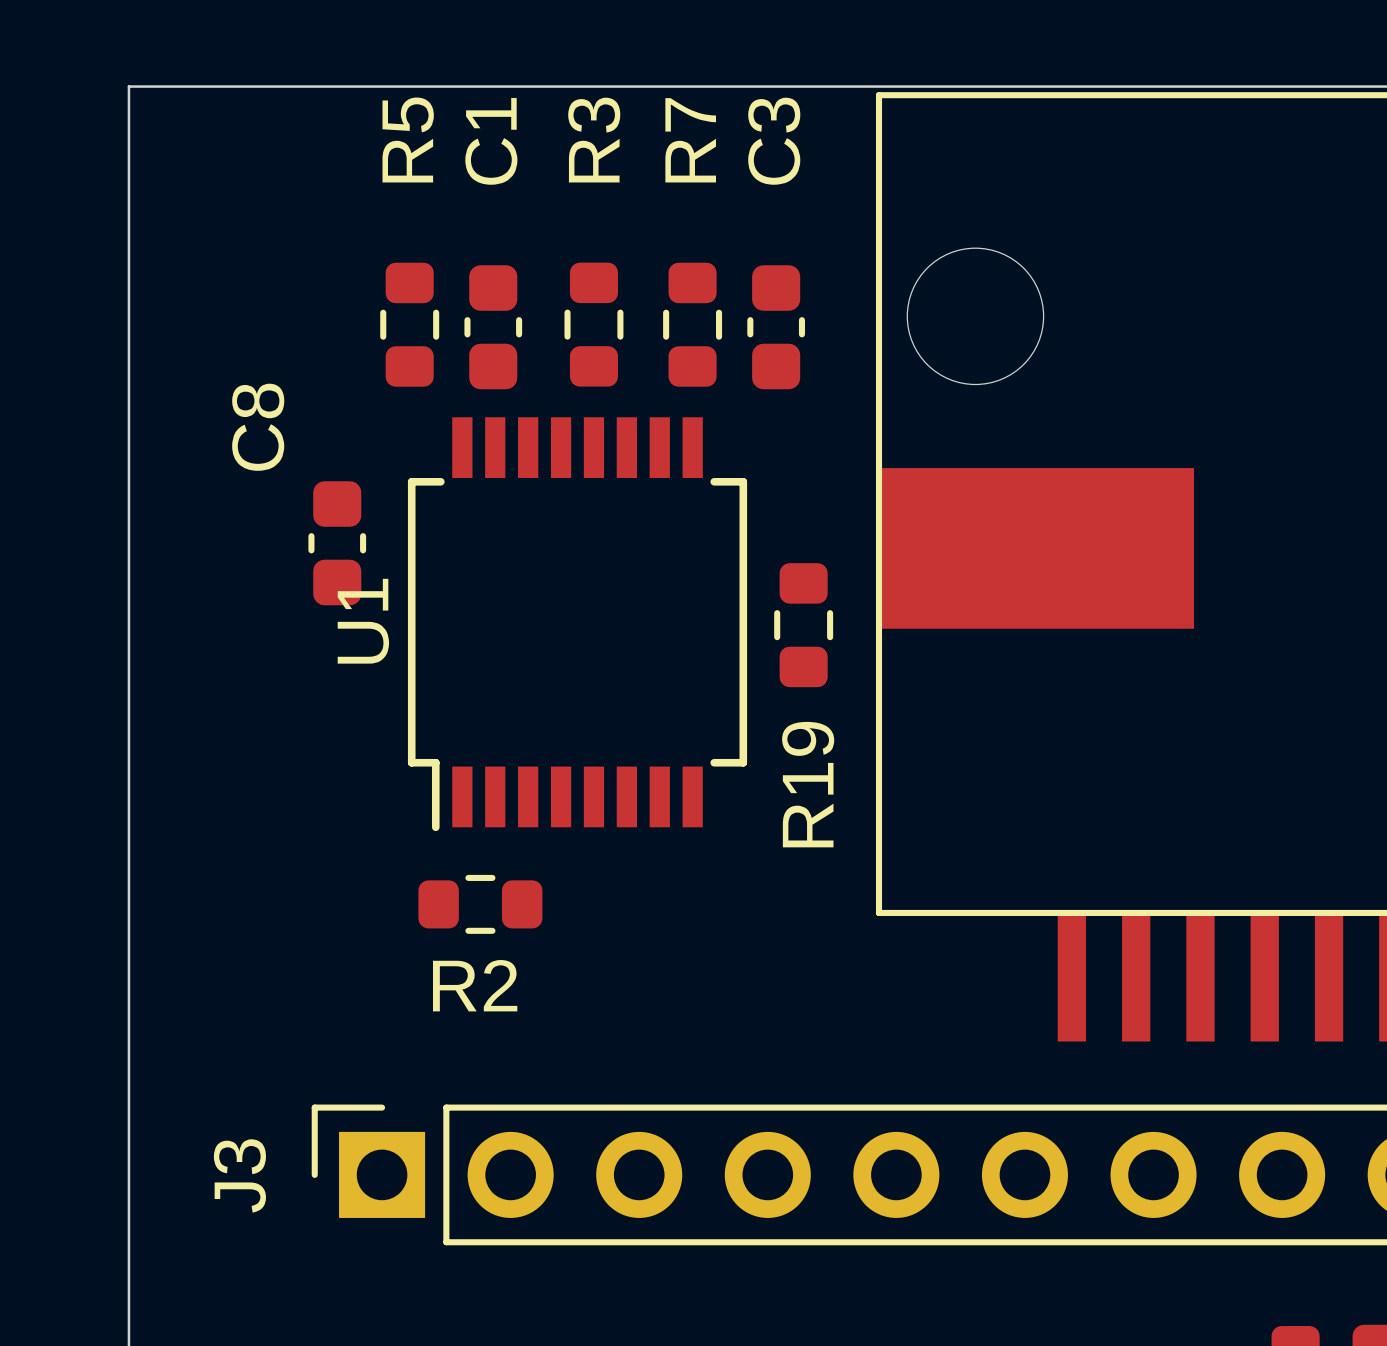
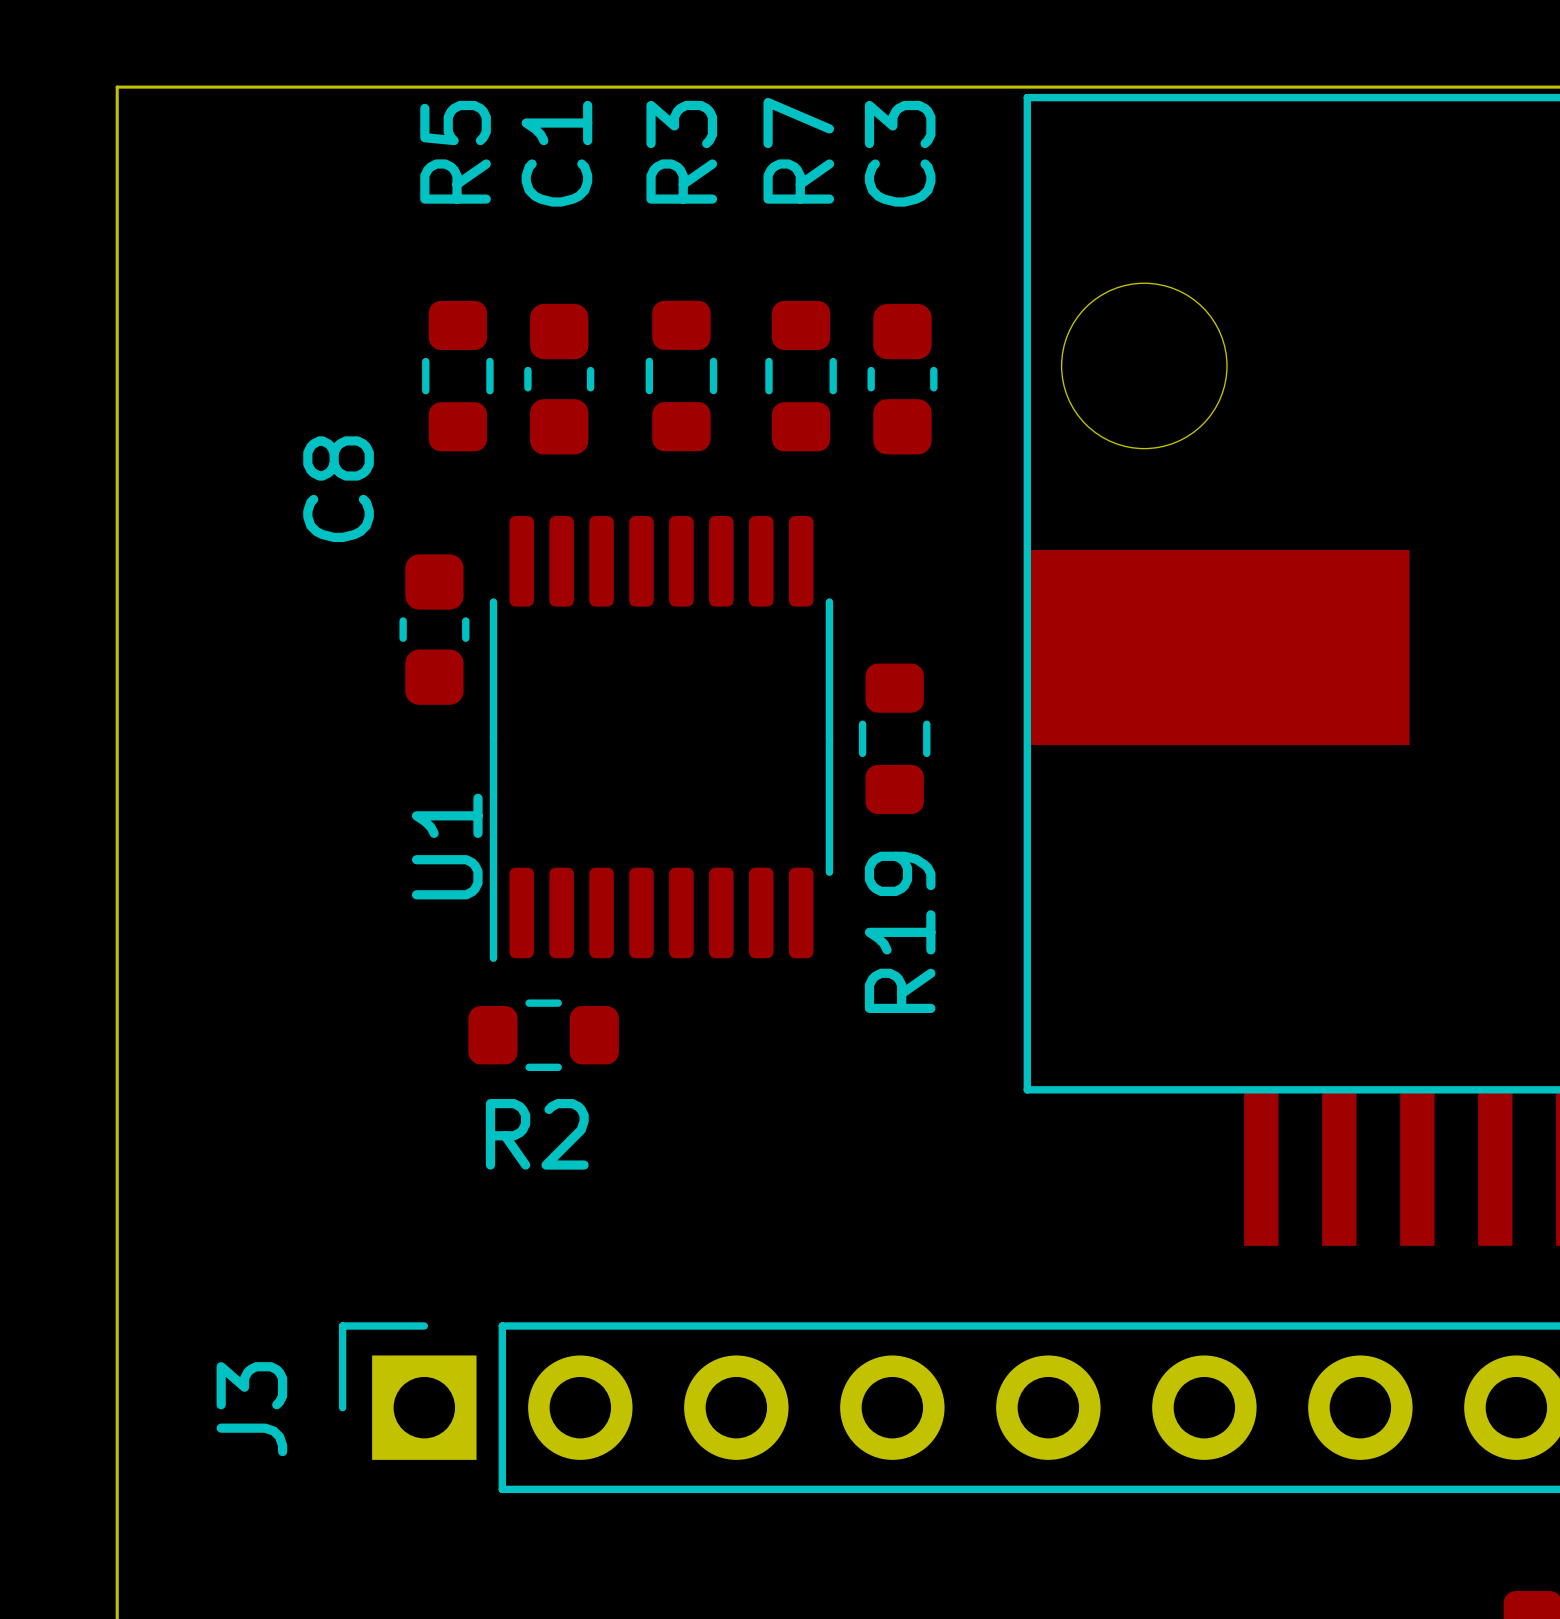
U1 footprint: [407, 417, 748, 832] -> [489, 516, 834, 962]
C8 position: (337, 543) -> (434, 629)
U1 name position: U1 (363, 621) -> U1 (447, 846)
R19 position: (803, 625) -> (894, 738)
R2 position: (480, 904) -> (543, 1035)

